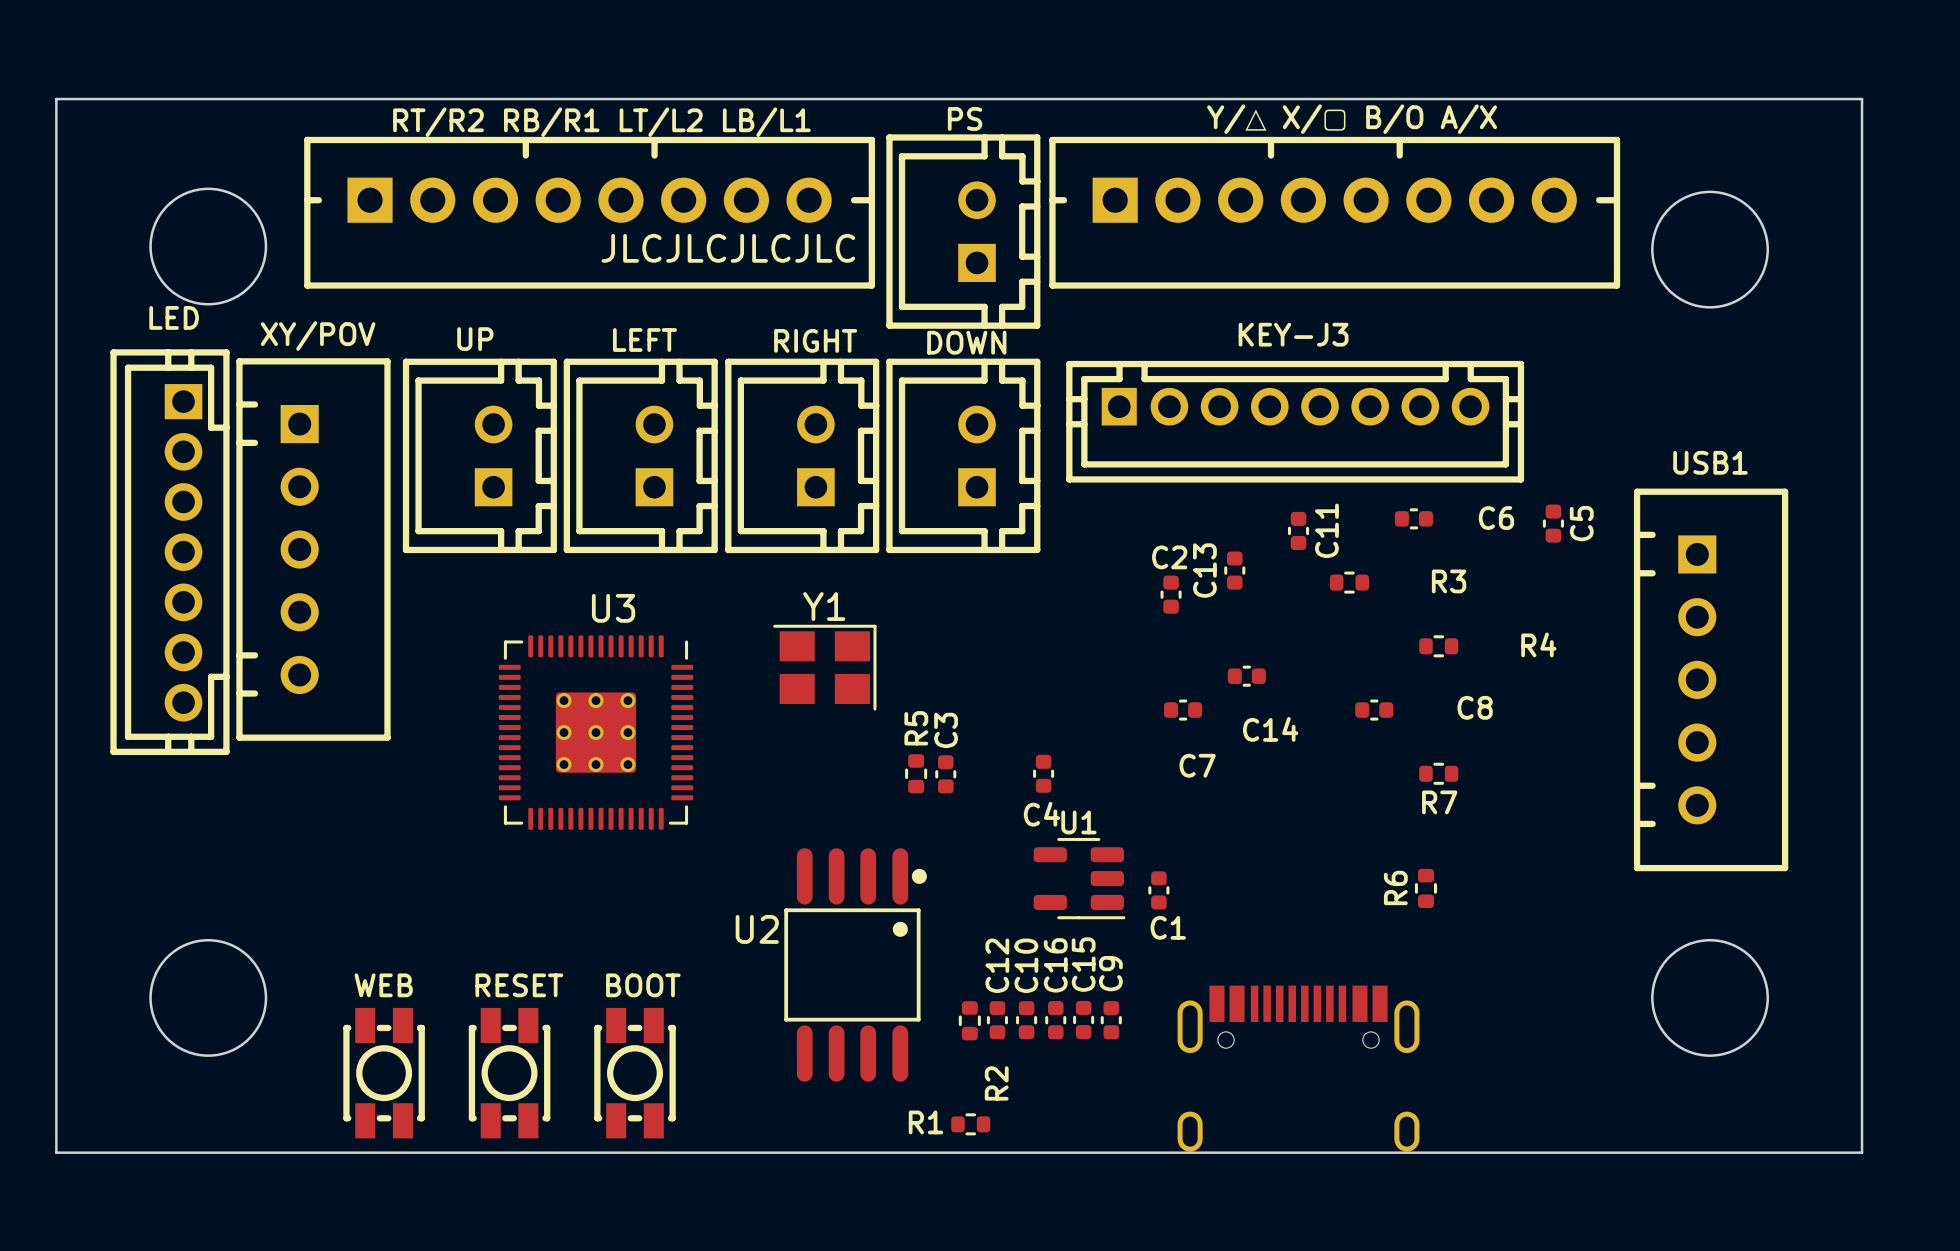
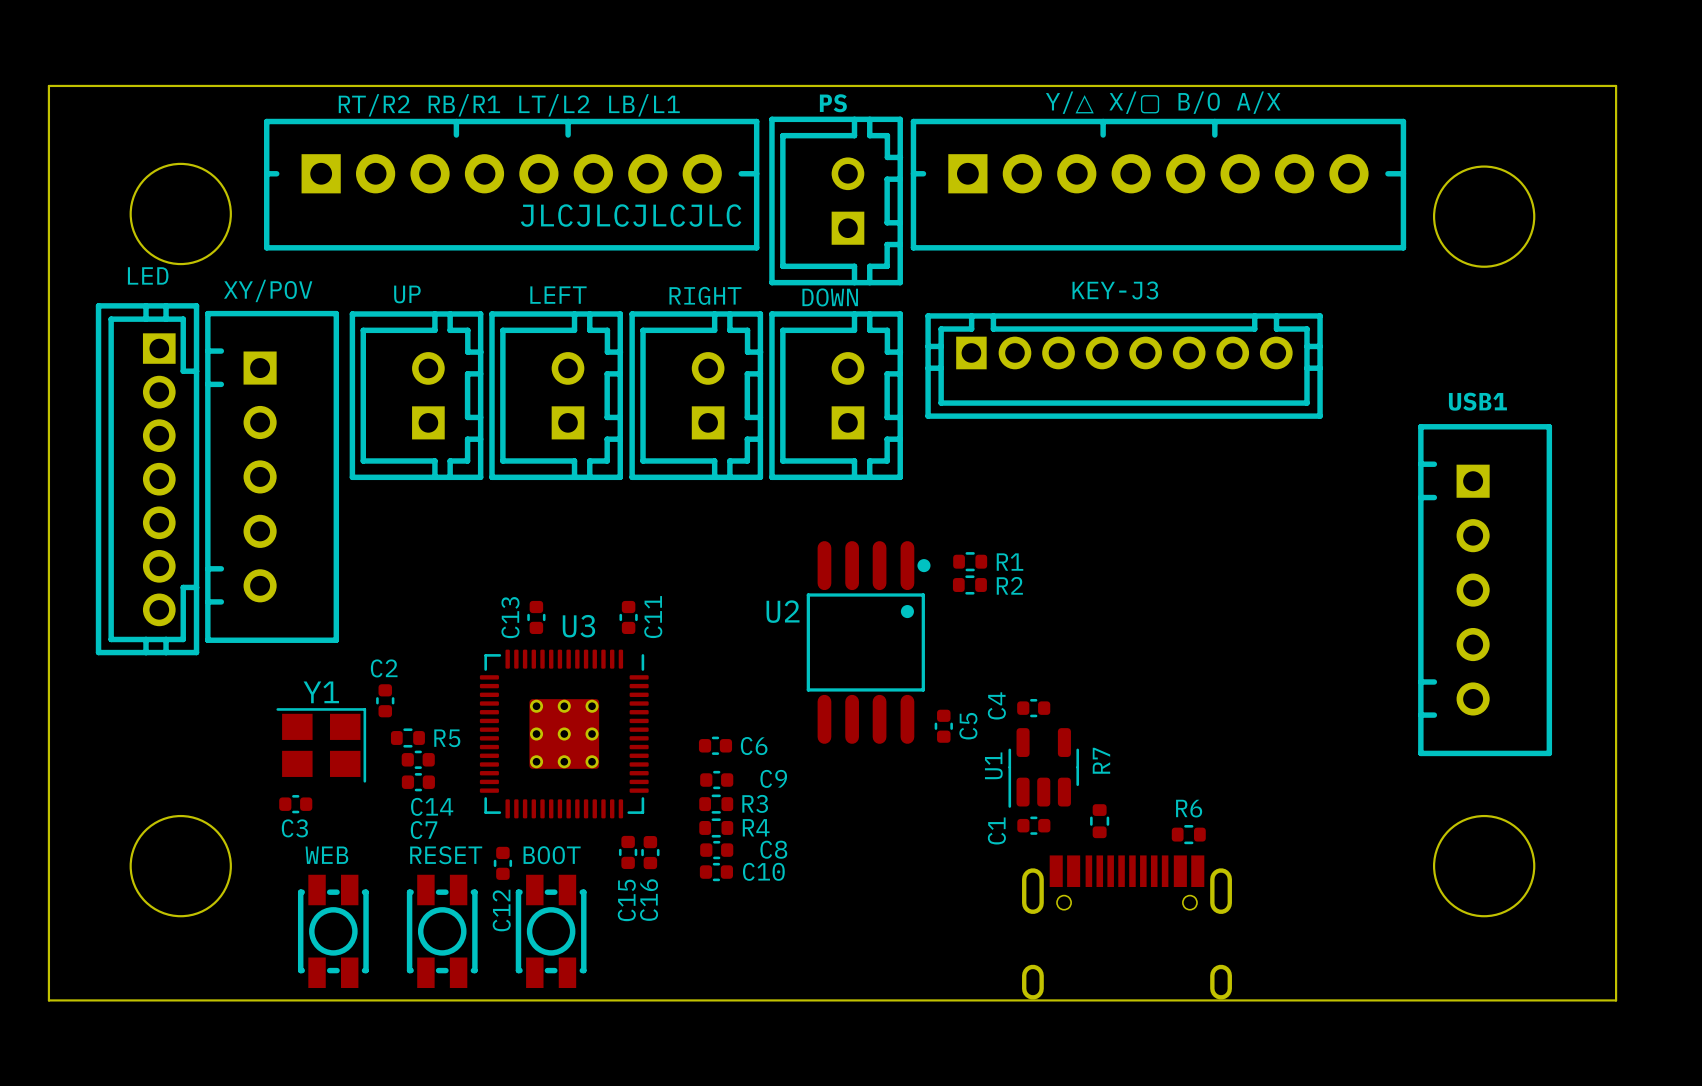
C6 position: (1413, 518) -> (715, 745)
C6 name position: C6 (1496, 518) -> C6 (754, 746)
C5 position: (1553, 523) -> (943, 726)
C11 position: (1298, 530) -> (628, 617)
C13 position: (1234, 570) -> (536, 617)
R3 name position: R3 (1449, 581) -> R3 (755, 803)
R3 position: (1349, 582) -> (716, 804)
C2 position: (1171, 594) -> (385, 700)
R4 name position: R4 (1538, 644) -> R4 (756, 827)
R4 position: (1438, 646) -> (716, 827)
Y1 position: (824, 667) -> (321, 745)
C14 position: (1246, 676) -> (418, 759)
C8 name position: C8 (1475, 707) -> C8 (773, 849)
C7 position: (1183, 710) -> (418, 782)
C8 position: (1374, 710) -> (716, 850)
C14 name position: C14 (1270, 729) -> C14 (432, 806)
C3 name position: C3 (946, 730) -> C3 (294, 828)
U3 position: (595, 732) -> (564, 734)
C7 name position: C7 (1197, 765) -> C7 (424, 830)
R5 rotation: 0° (916, 773) -> 90° clockwise (407, 737)
R5 position: (916, 773) -> (407, 737)
C4 rotation: 0° (1043, 773) -> 90° clockwise (1033, 708)
C4 position: (1043, 773) -> (1033, 708)
R7 rotation: 0° (1438, 773) -> 90° clockwise (1099, 821)
R7 position: (1438, 773) -> (1099, 821)
C3 rotation: 0° (945, 774) -> 90° clockwise (295, 804)
C3 position: (945, 774) -> (295, 804)
R7 name position: R7 (1439, 802) -> R7 (1101, 760)
U1 name position: U1 (1078, 822) -> U1 (993, 765)
U1 rotation: 0° (1079, 878) -> 90° clockwise (1043, 767)
U1 position: (1079, 878) -> (1043, 767)
R6 rotation: 0° (1425, 888) -> 90° clockwise (1188, 834)
R6 position: (1425, 888) -> (1188, 834)
C1 rotation: 0° (1158, 890) -> 90° clockwise (1033, 825)
C1 position: (1158, 890) -> (1033, 825)
U2 position: (855, 964) -> (868, 642)
C15 name position: C15 (1083, 964) -> C15 (626, 900)
C12 name position: C12 (997, 965) -> C12 (501, 910)
C16 name position: C16 (1055, 965) -> C16 (649, 900)
C15 position: (1083, 1019) -> (628, 852)
R2 rotation: 0° (969, 1020) -> 90° clockwise (969, 585)
R2 position: (969, 1020) -> (969, 585)
C12 position: (997, 1020) -> (502, 863)
C10 rotation: 0° (1026, 1020) -> 90° clockwise (716, 872)
C10 position: (1026, 1020) -> (716, 872)
C16 position: (1055, 1020) -> (650, 852)
C9 rotation: 0° (1111, 1020) -> 90° clockwise (716, 780)
C9 position: (1111, 1020) -> (716, 780)
R2 name position: R2 (996, 1083) -> R2 (1009, 585)
R1 name position: R1 (925, 1122) -> R1 (1010, 562)
R1 position: (970, 1124) -> (970, 561)

